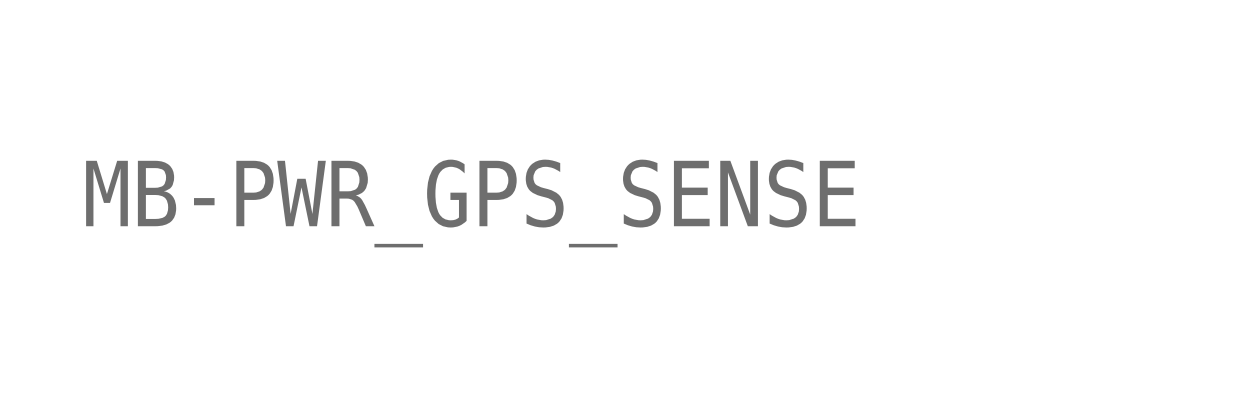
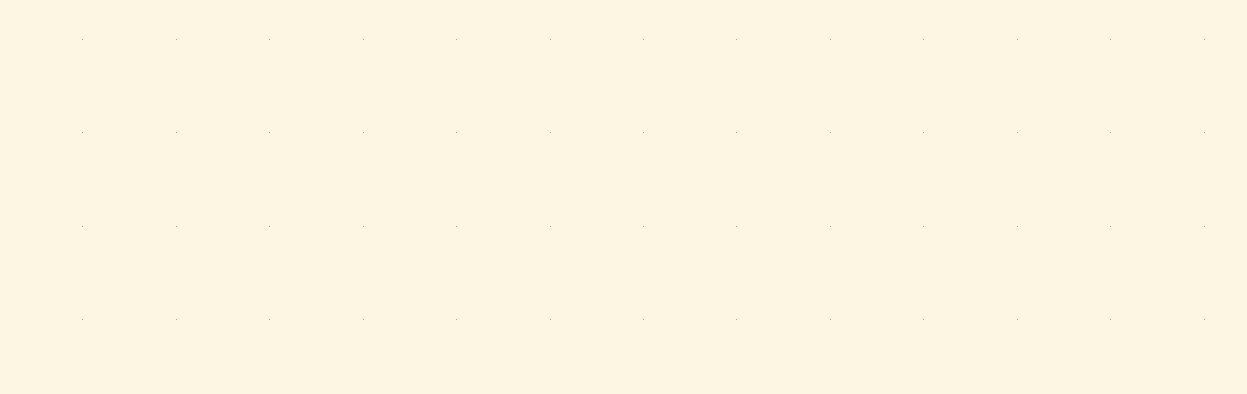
label: MB-PWR_GPS_SENSE (470, 203) -> none

